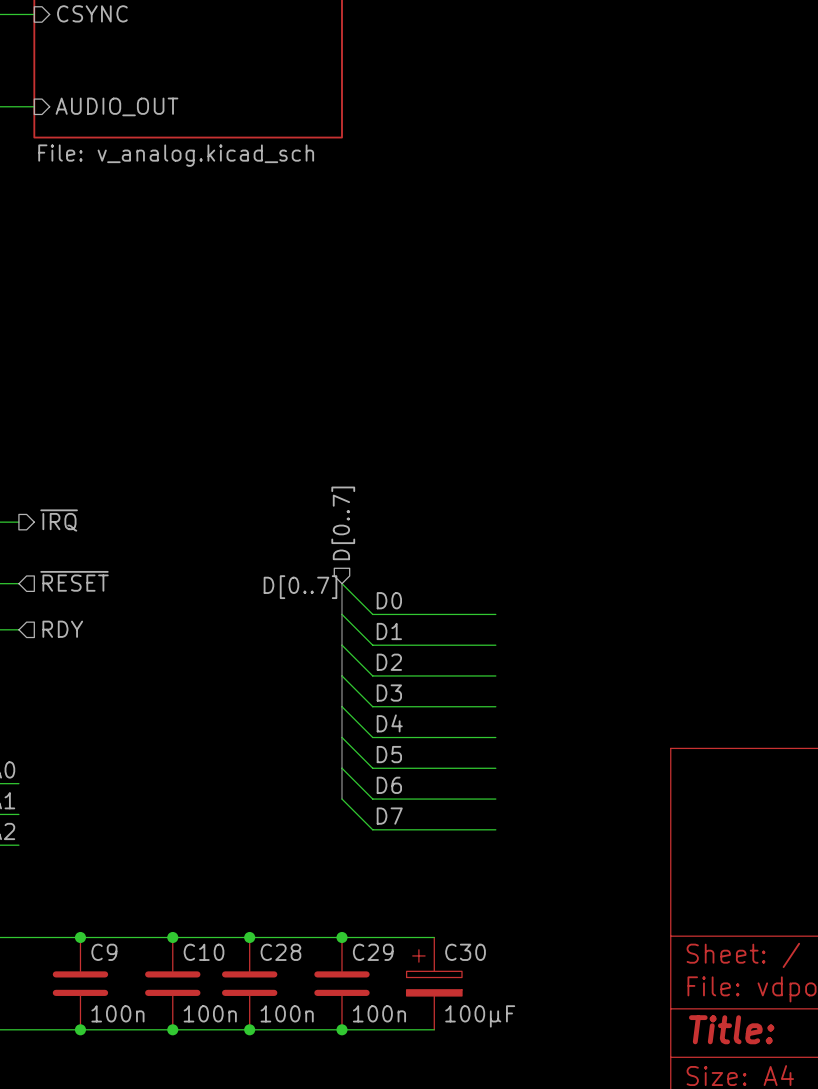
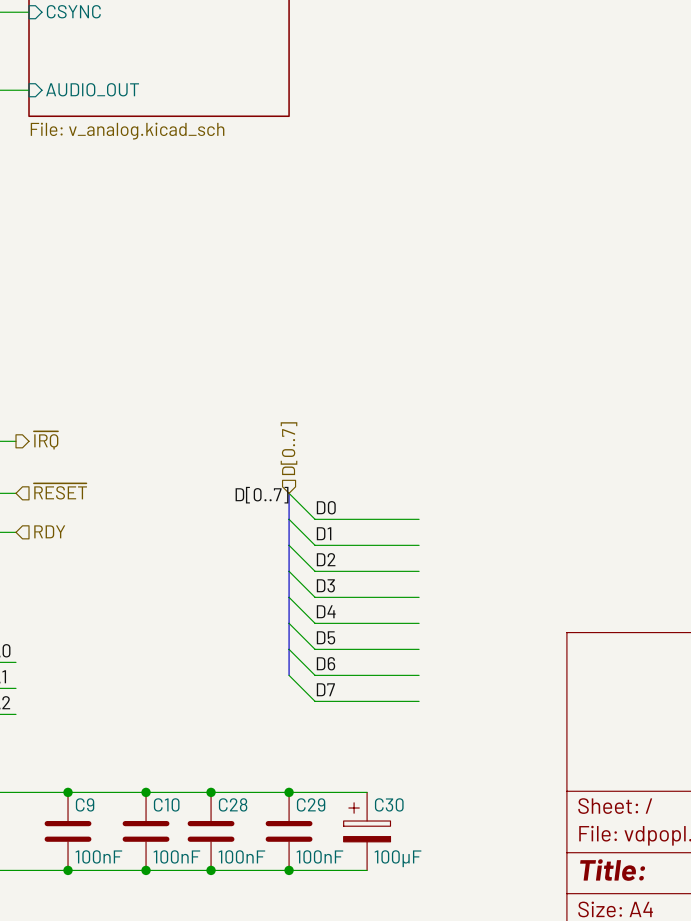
C9 value: 100n (117, 1013) -> 100nF (98, 856)
C10 value: 100n (210, 1013) -> 100nF (176, 856)
C28 value: 100n (287, 1013) -> 100nF (241, 856)
C29 value: 100n (379, 1013) -> 100nF (319, 856)

